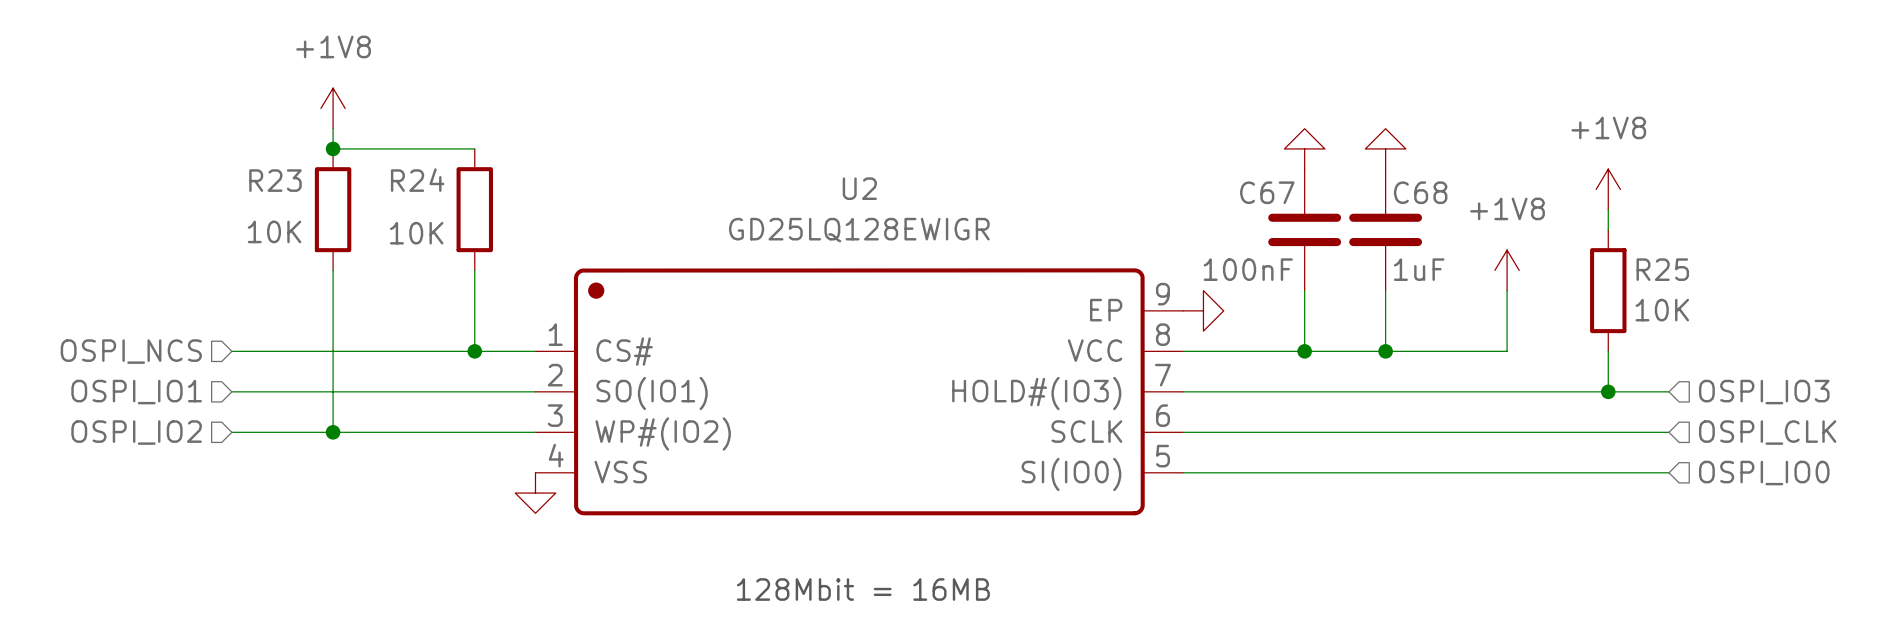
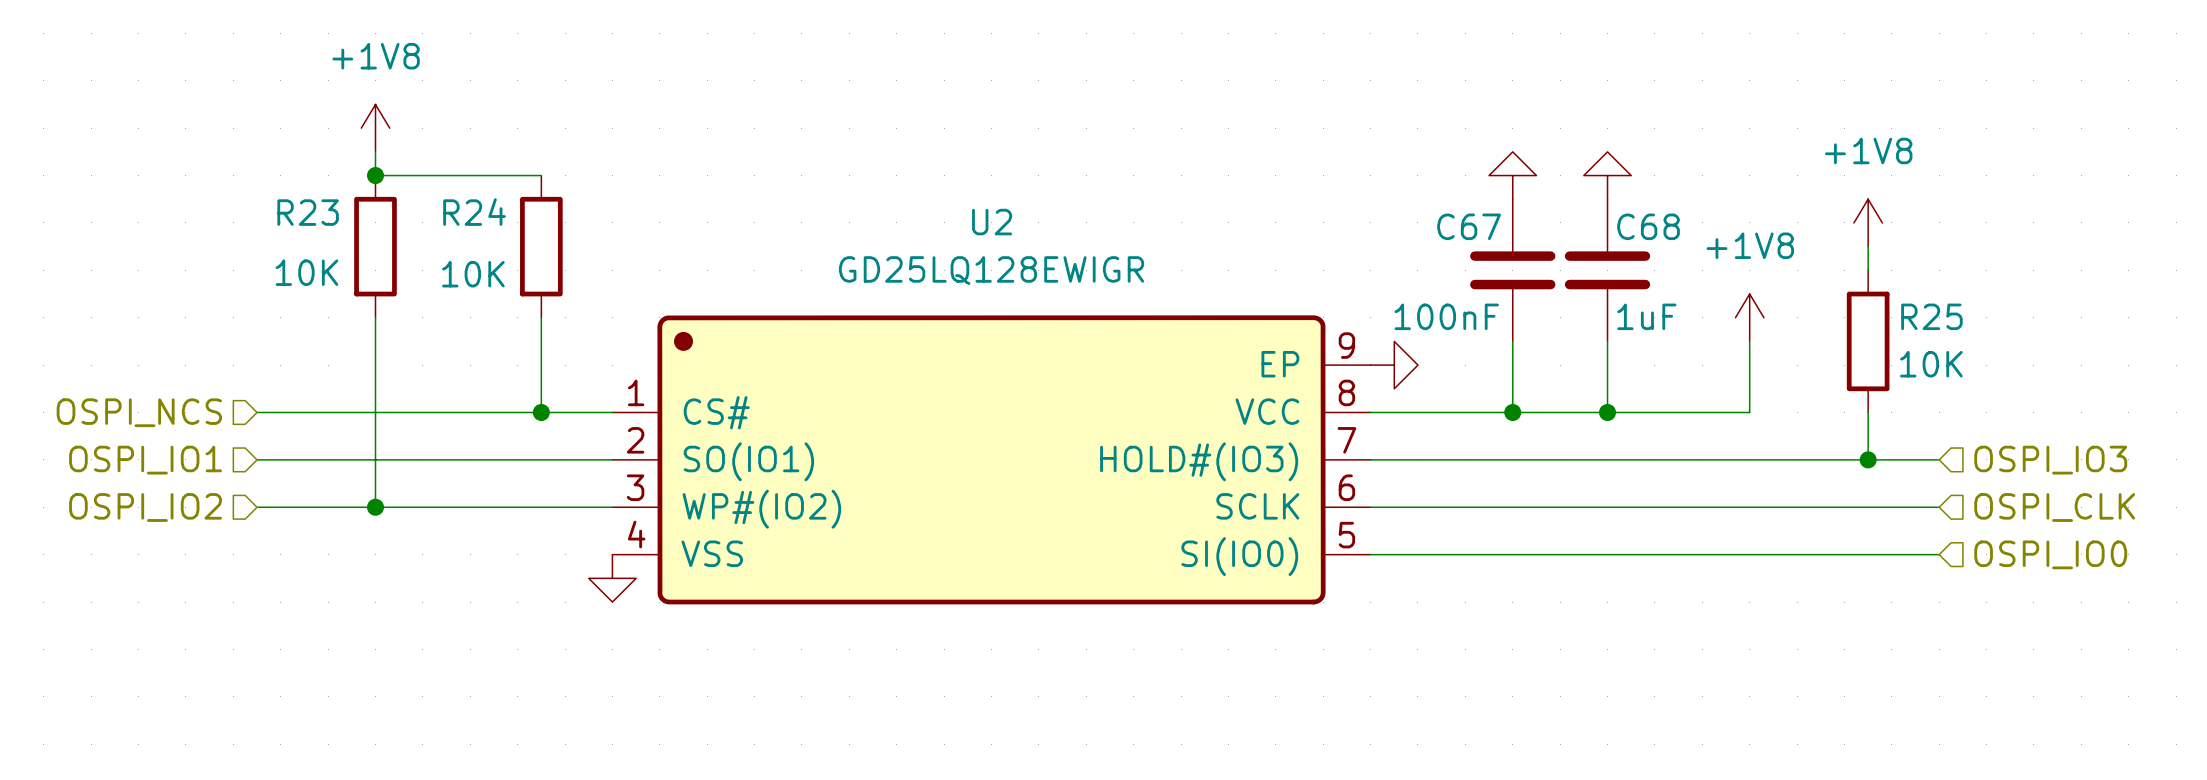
text: 128Mbit = 16MB (863, 589) -> none

